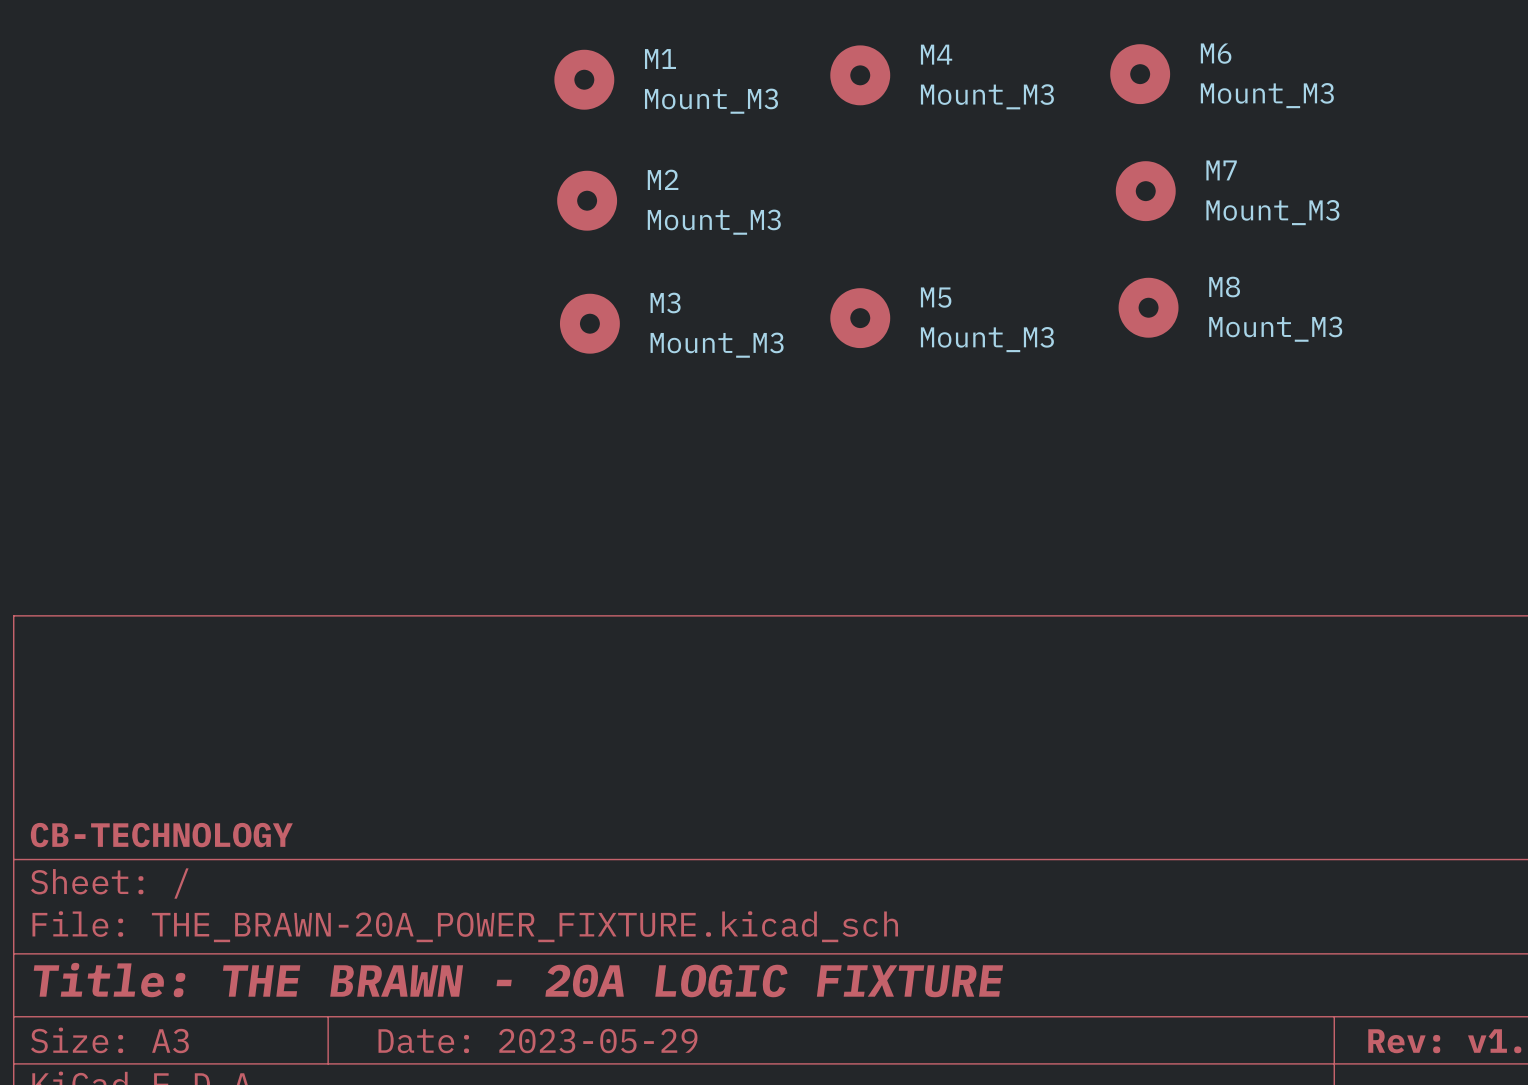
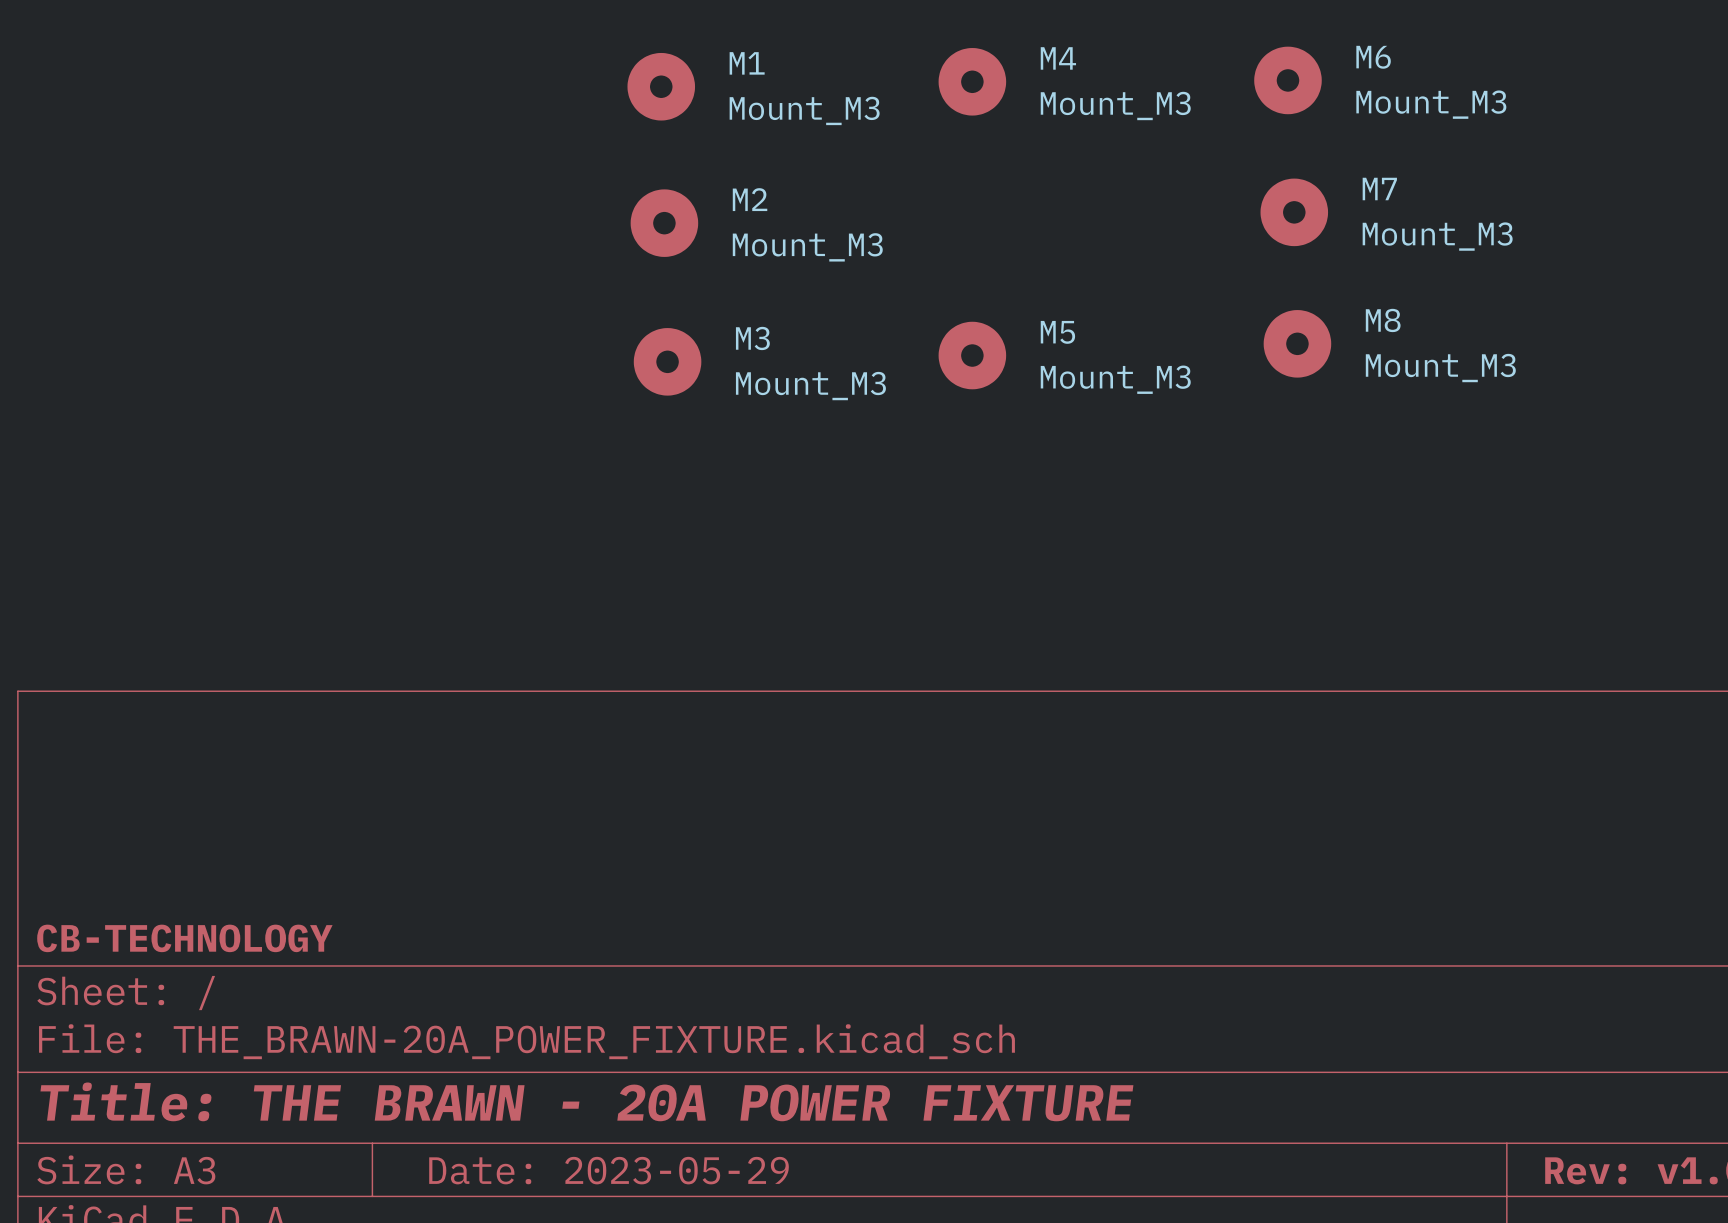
title block: Title: THE BRAWN - 20A LOGIC FIXTURE (518, 980) -> Title: THE BRAWN - 20A POWER FIXTURE (586, 1101)

